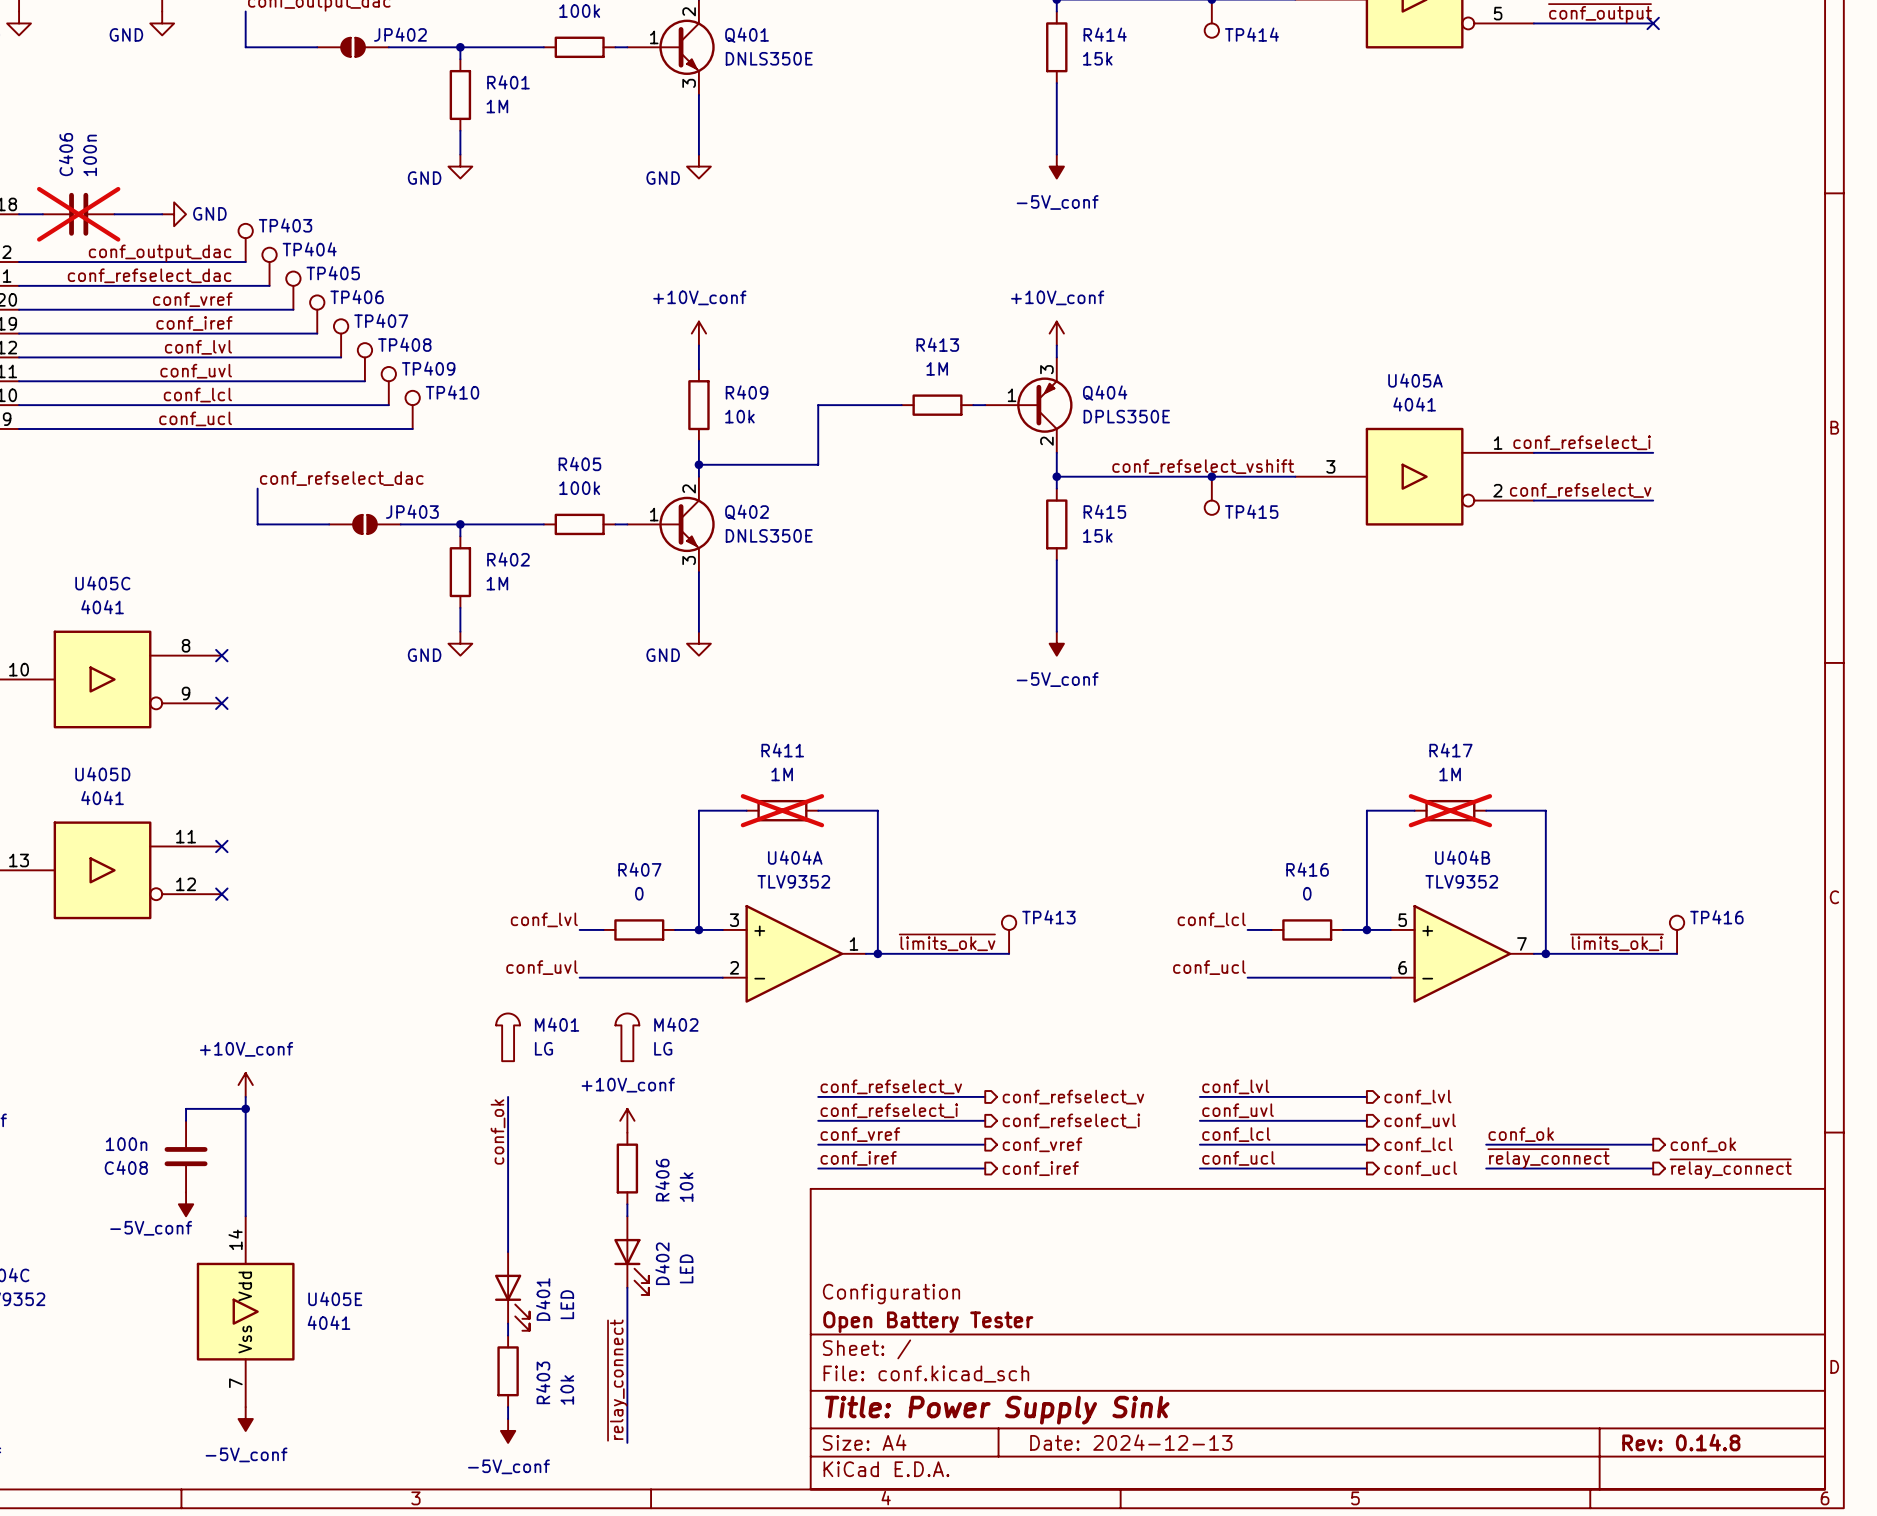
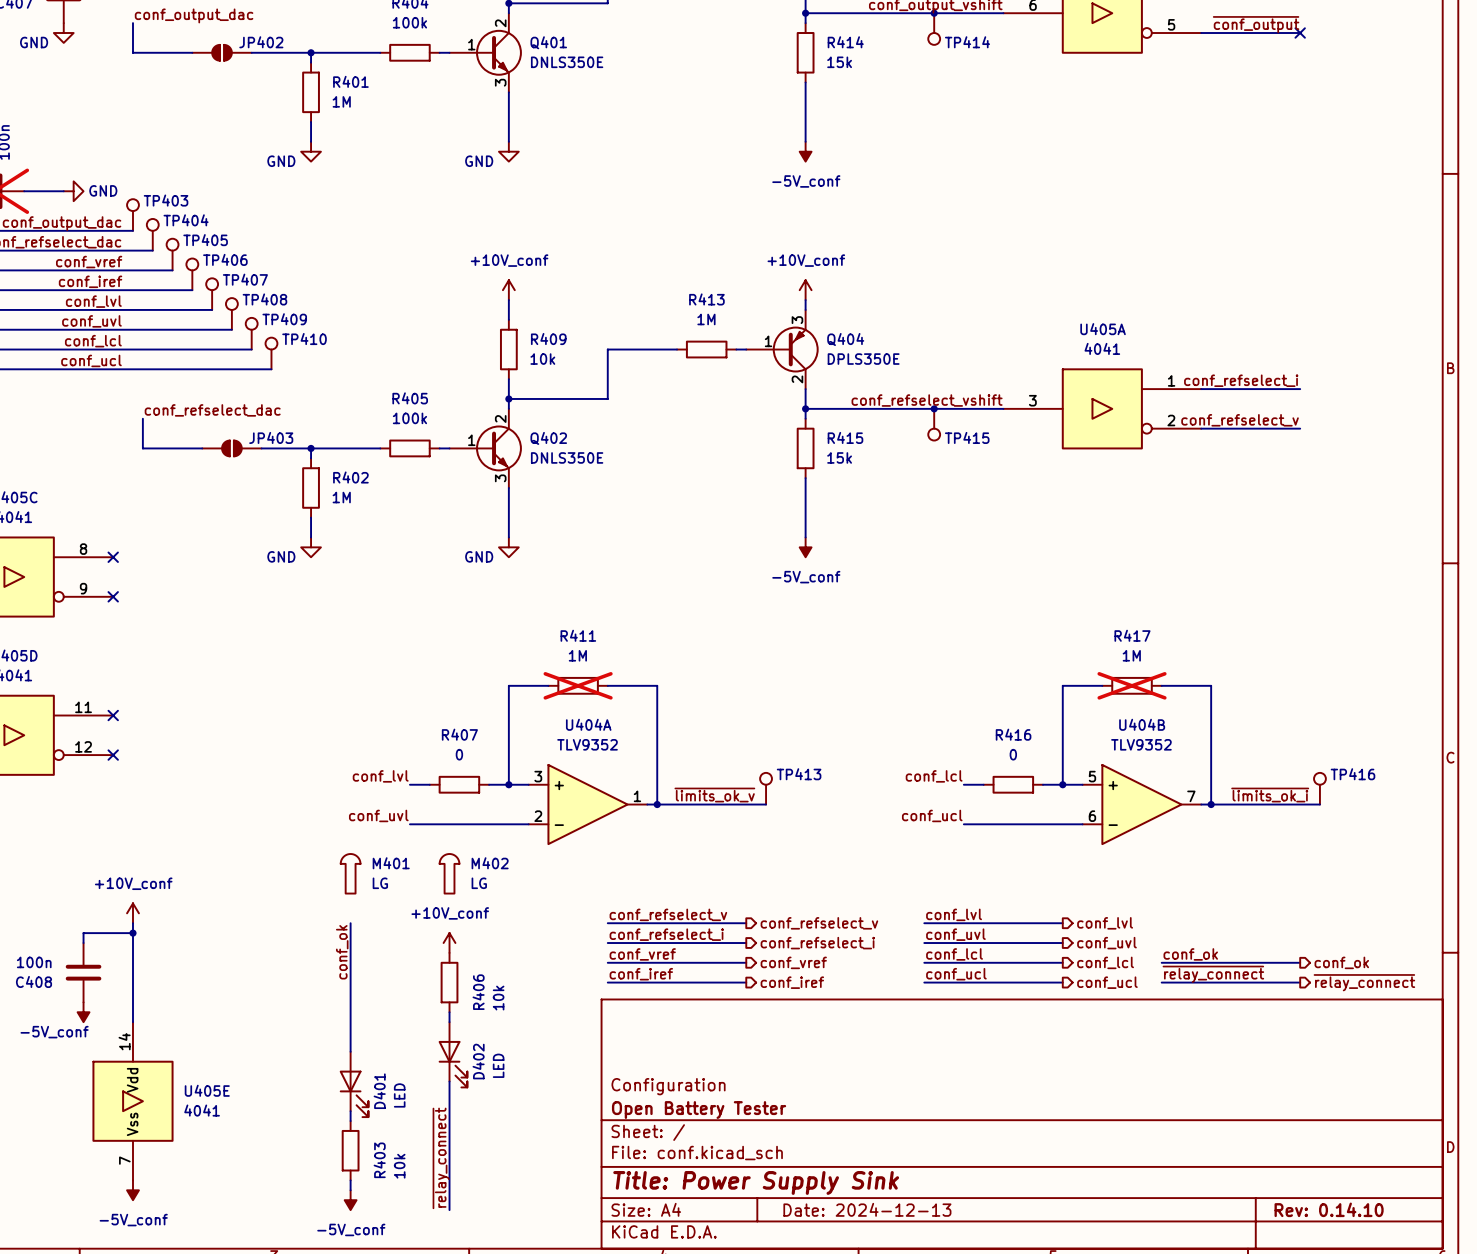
title block: Rev: 0.14.8 (1681, 1442) -> Rev: 0.14.10 (1329, 1209)

